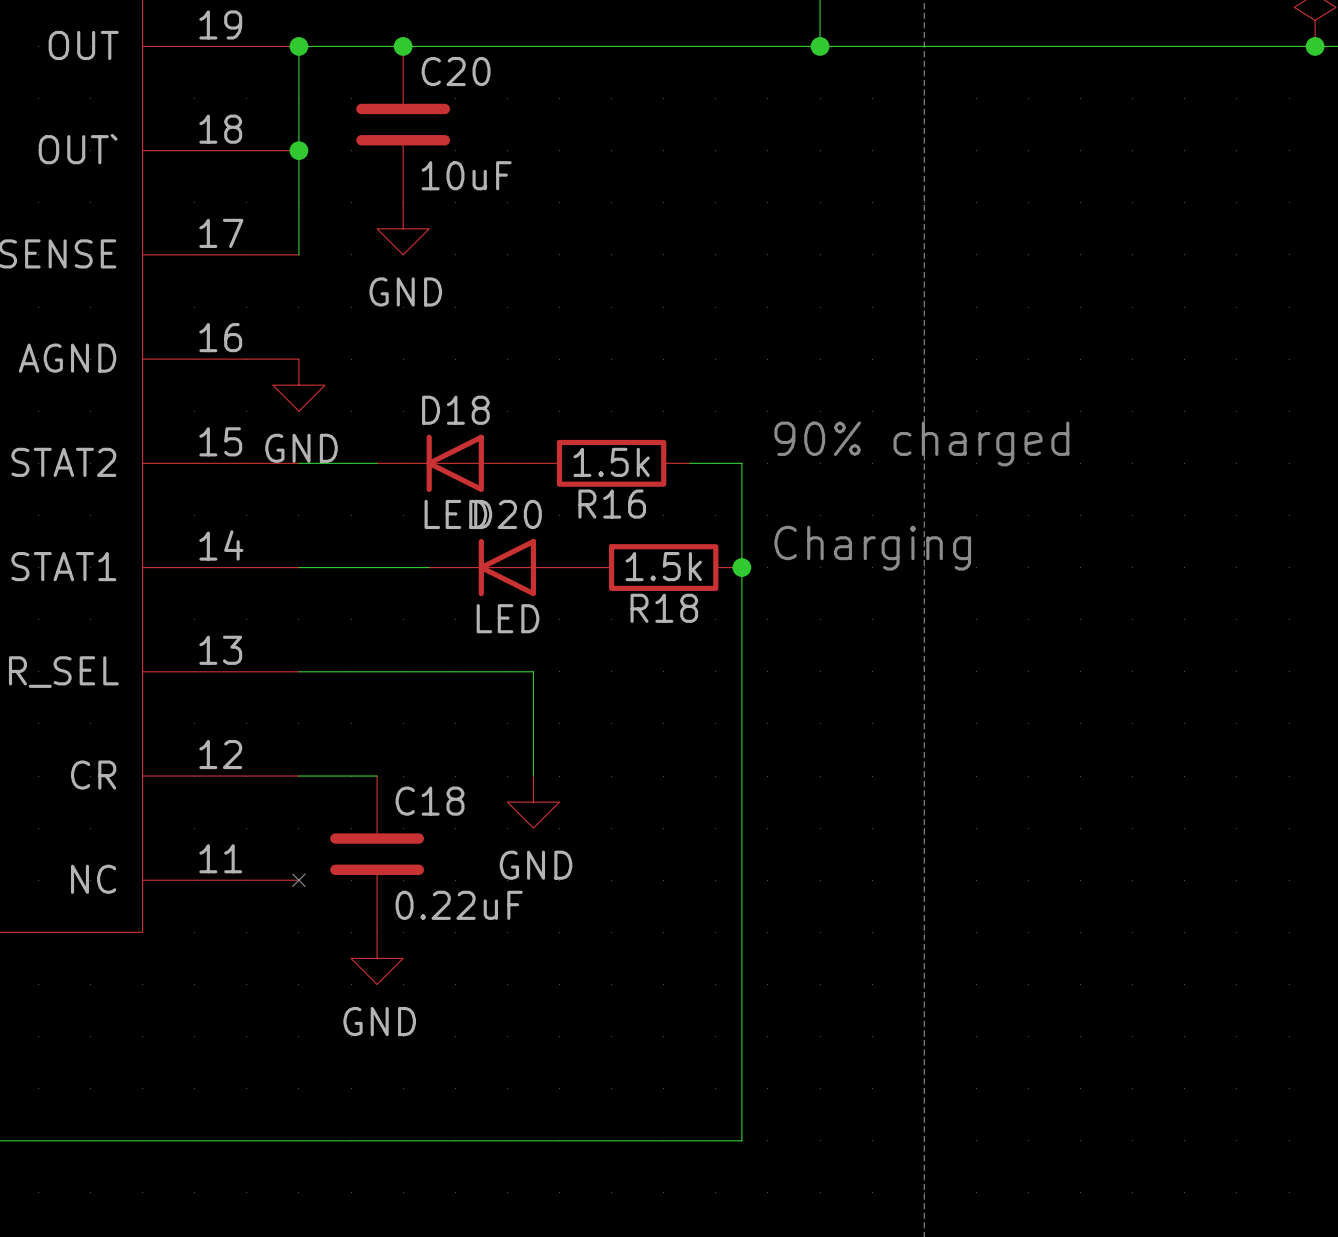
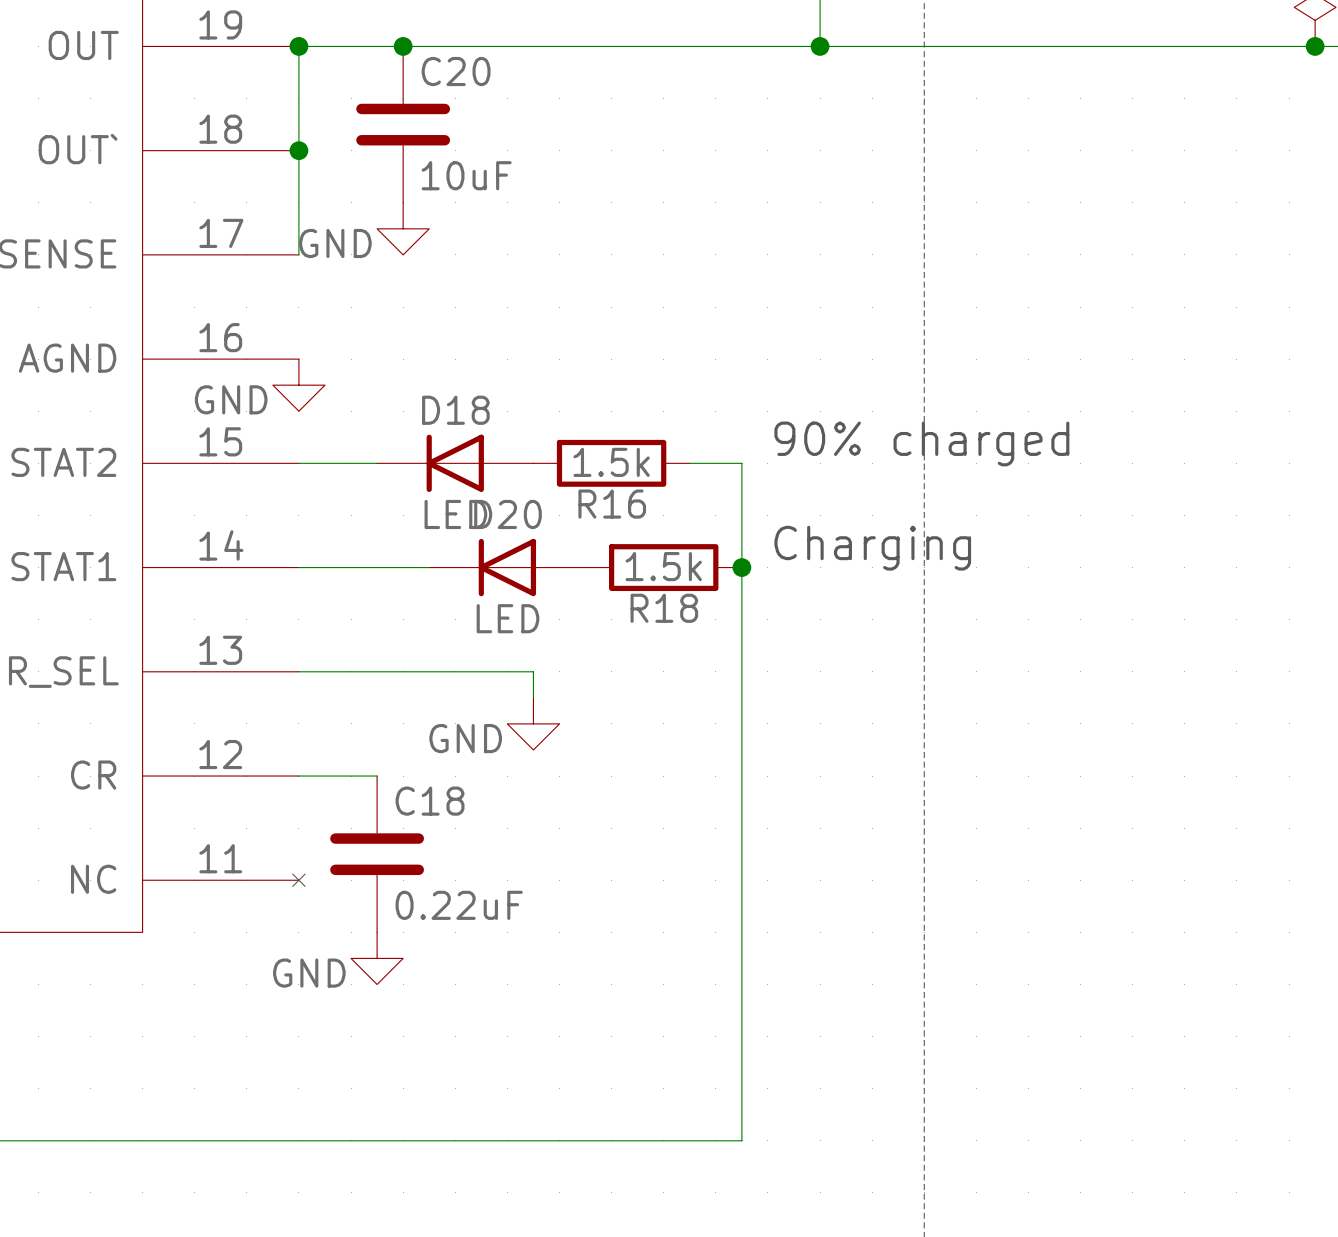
power symbol text position: GND (405, 291) -> GND (335, 243)
power symbol text position: GND (301, 448) -> GND (231, 399)
wire: (533, 697) (533, 776) -> none
power symbol position: GND (533, 802) -> GND (533, 723)
power symbol text position: GND (536, 865) -> GND (465, 738)
power symbol text position: GND (379, 1021) -> GND (309, 973)

